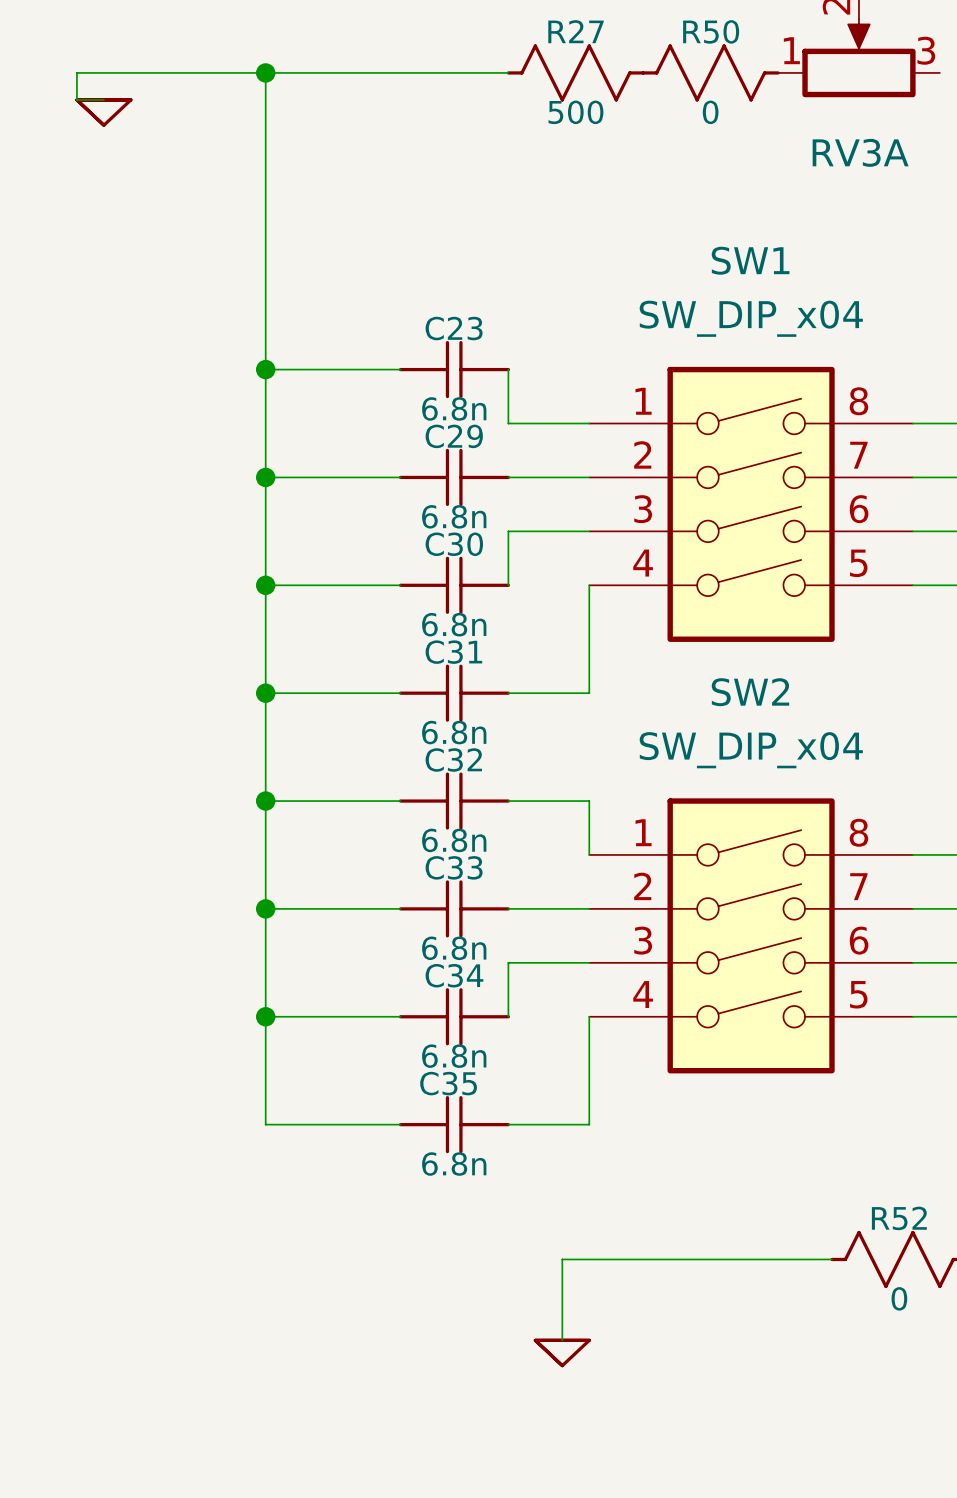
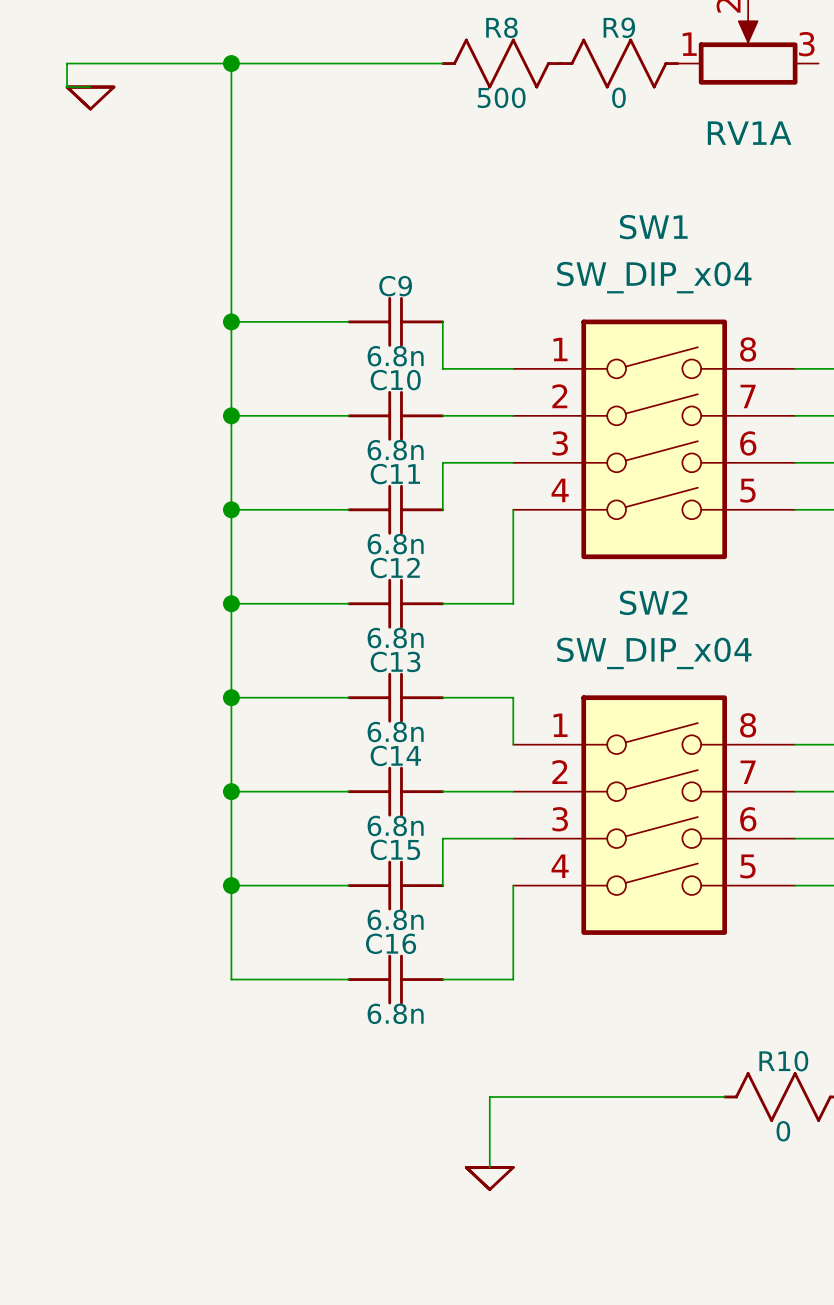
R27 name: R27 (576, 31) -> R8 (501, 27)
R50 name: R50 (711, 31) -> R9 (619, 27)
RV3A name: RV3A (860, 152) -> RV1A (749, 133)
C23 name: C23 (454, 328) -> C9 (395, 286)
C29 name: C29 (454, 436) -> C10 (395, 380)
C30 name: C30 (454, 544) -> C11 (395, 474)
C31 name: C31 (453, 652) -> C12 (395, 568)
C32 name: C32 (453, 759) -> C13 (395, 661)
C33 name: C33 (454, 867) -> C14 (395, 755)
C34 name: C34 (454, 975) -> C15 (395, 849)
C35 name: C35 (448, 1083) -> C16 (391, 943)
R52 name: R52 (899, 1218) -> R10 (783, 1061)

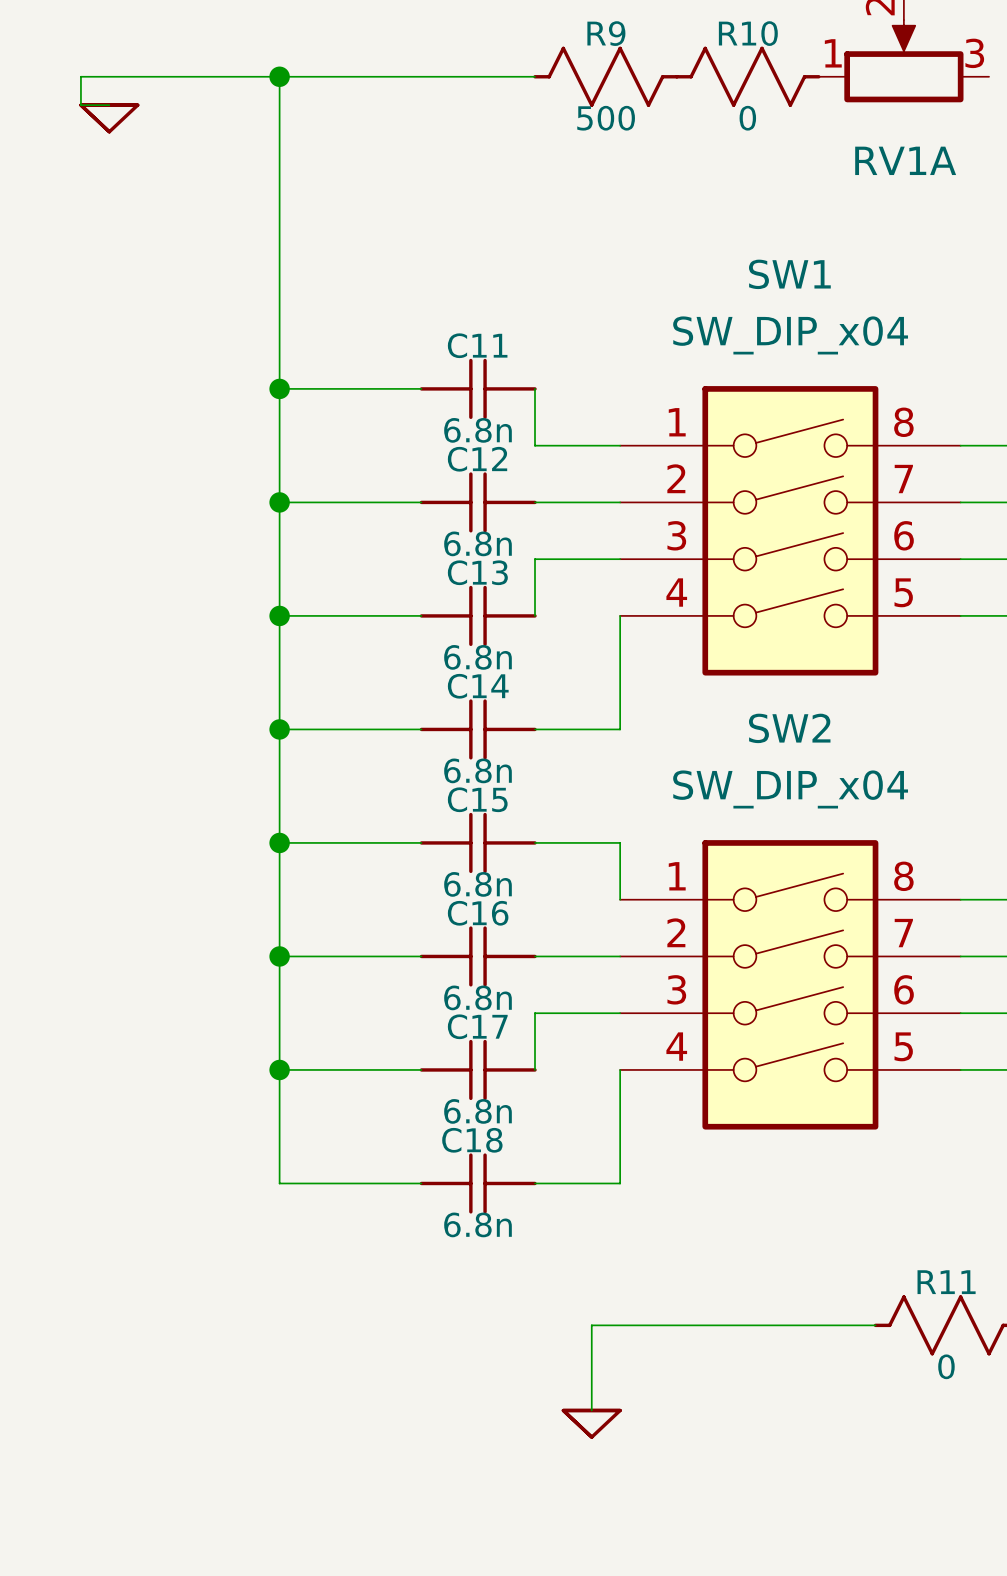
R8 name: R8 (501, 27) -> R9 (606, 33)
R9 name: R9 (619, 27) -> R10 (748, 33)
C9 name: C9 (395, 286) -> C11 (477, 345)
C10 name: C10 (395, 380) -> C12 (477, 459)
C11 name: C11 (395, 474) -> C13 (477, 572)
C12 name: C12 (395, 568) -> C14 (478, 686)
C13 name: C13 (395, 661) -> C15 (477, 799)
C14 name: C14 (395, 755) -> C16 (478, 913)
C15 name: C15 (395, 849) -> C17 (477, 1026)
C16 name: C16 (391, 943) -> C18 (472, 1140)
R10 name: R10 (783, 1061) -> R11 (946, 1282)

